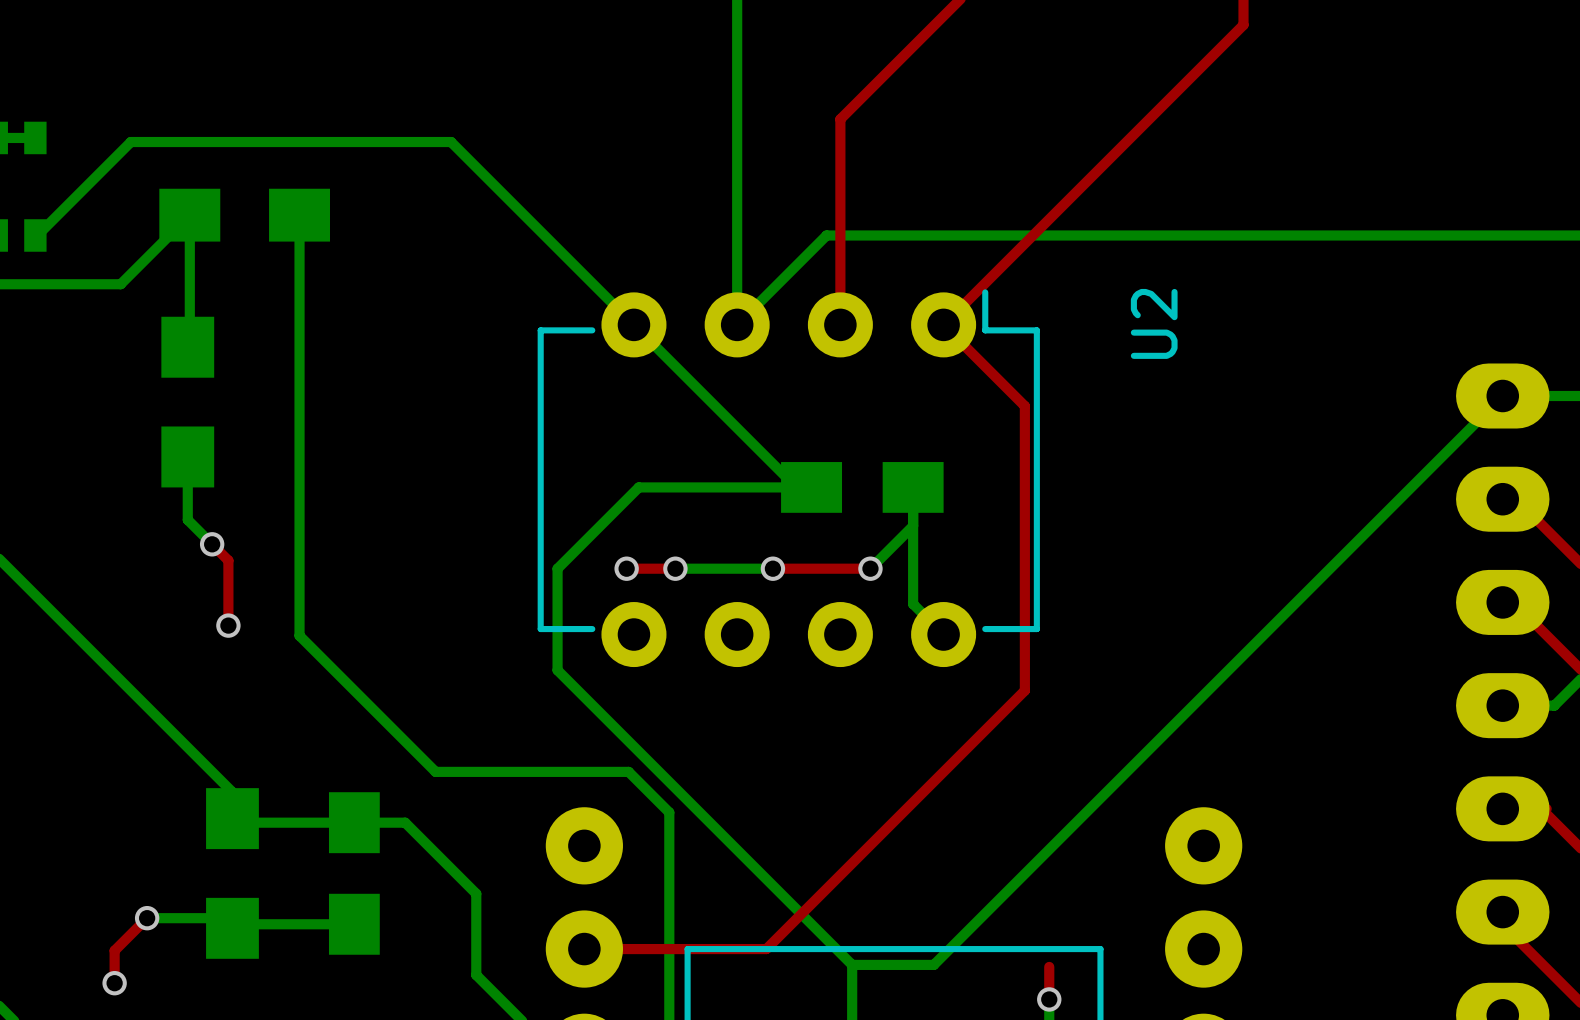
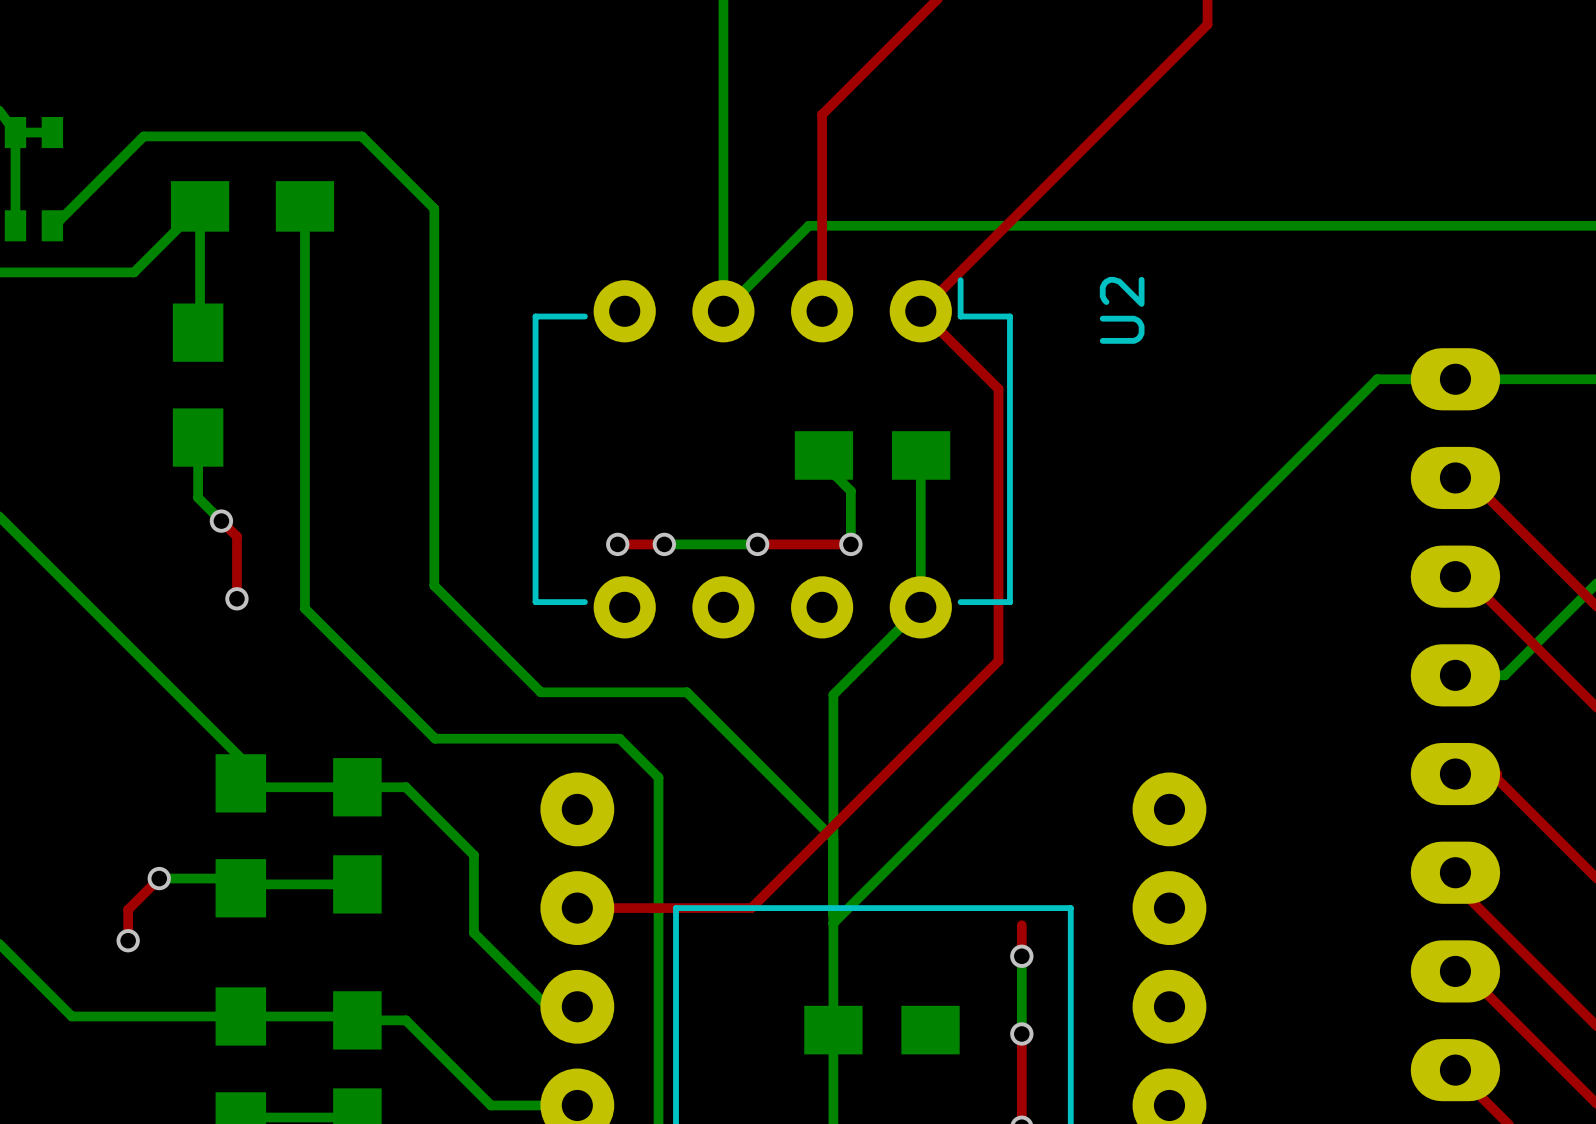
bottom track: (359, 142) (451, 142) (796, 487) -> (362, 136) (434, 208) (434, 585) (540, 692) (686, 692) (833, 838)
bottom track: (1502, 396) (933, 964) (852, 964) (557, 670) (557, 568) (638, 487) (811, 487) -> (1455, 379) (1377, 379) (833, 923) (833, 694) (920, 607) (920, 455)
part position: (862, 487) -> (872, 455)
bottom track: (913, 487) (913, 604) (943, 634) -> none
bottom track: (913, 526) (870, 568) -> (825, 465) (850, 491) (850, 544)

